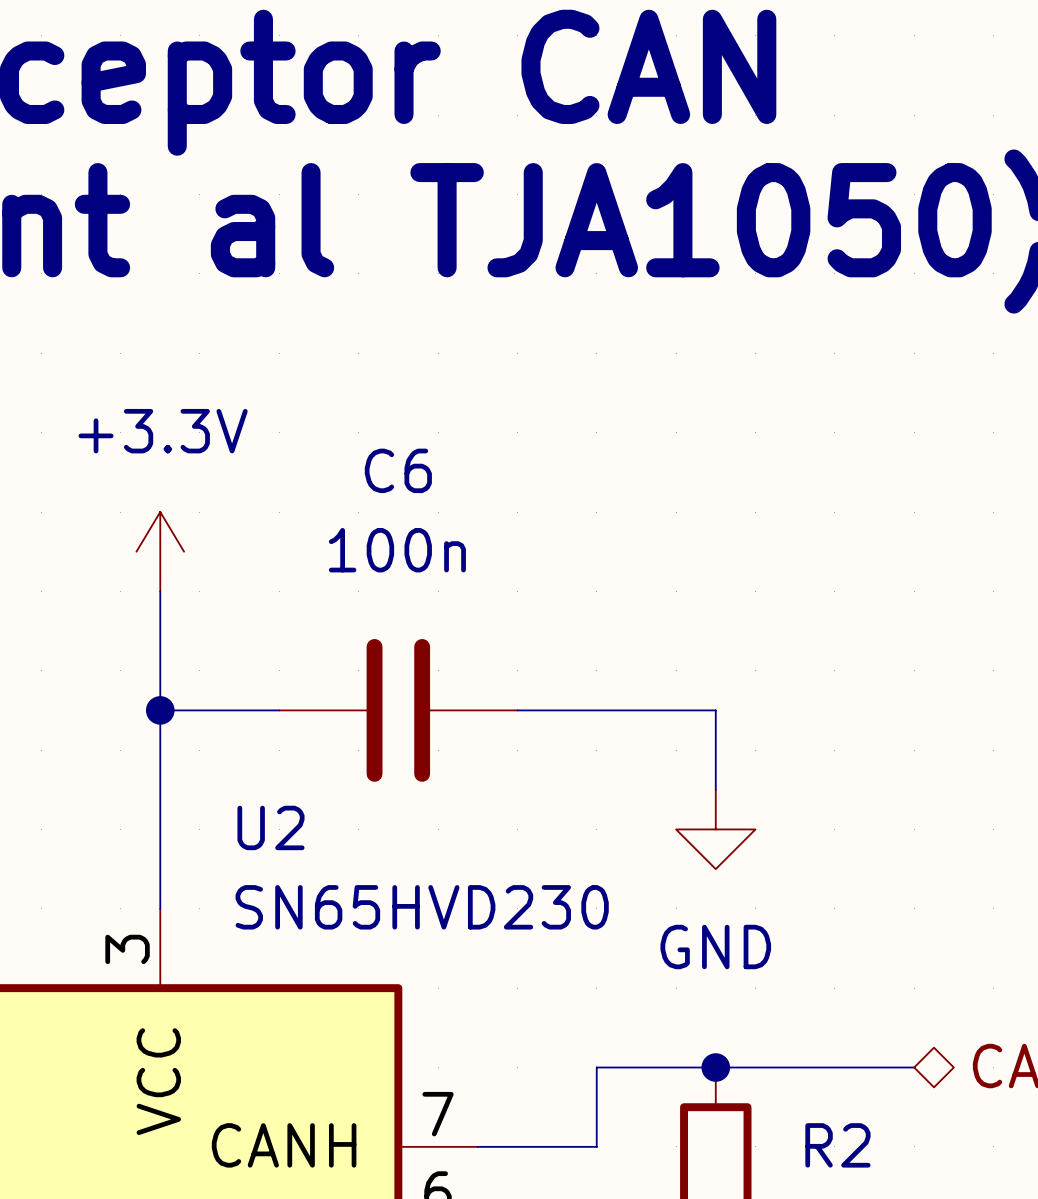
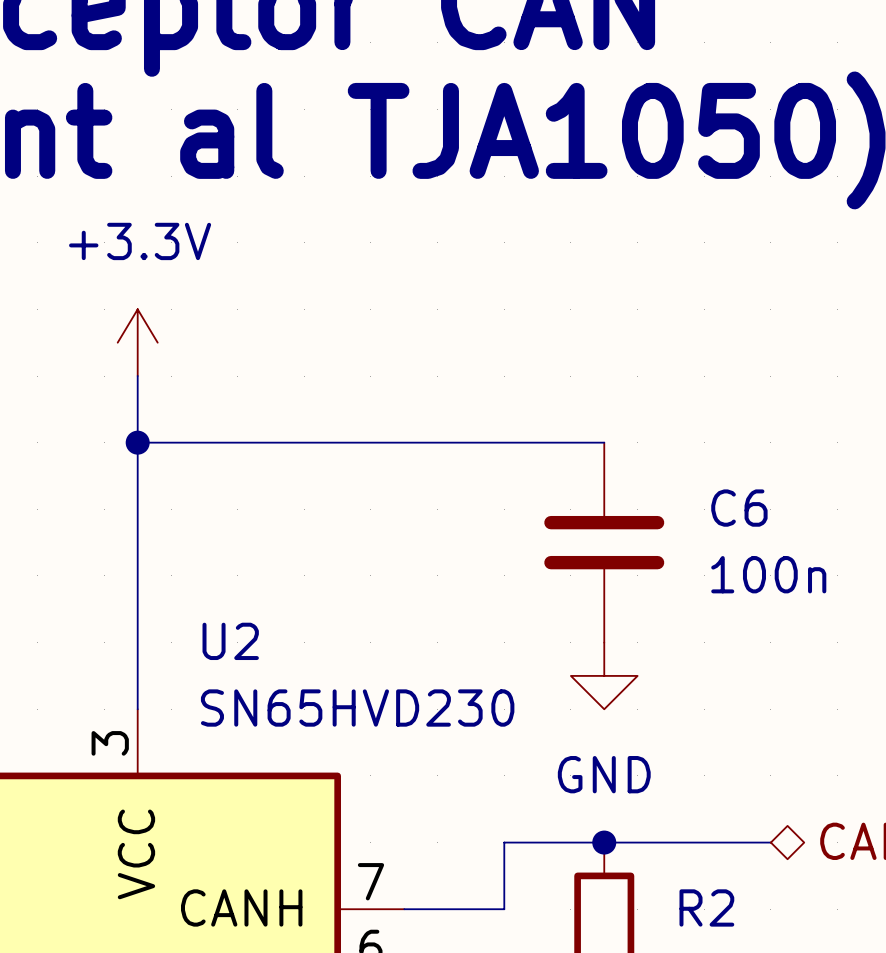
C6 name position: C6 (398, 470) -> C6 (739, 508)
wire: none -> (137, 376) (137, 442) (604, 442)
C6 value position: 100n (397, 550) -> 100n (768, 574)
power symbol position: +3.3V (160, 551) -> +3.3V (137, 342)
wire: (160, 710) (279, 710) -> none
junction position: (160, 710) -> (137, 442)
C6 rotation: 0° (398, 710) -> 90° clockwise (604, 542)
C6 position: (398, 710) -> (604, 542)
wire: (517, 710) (715, 710) (715, 789) -> none
power symbol position: GND (715, 829) -> GND (604, 675)

